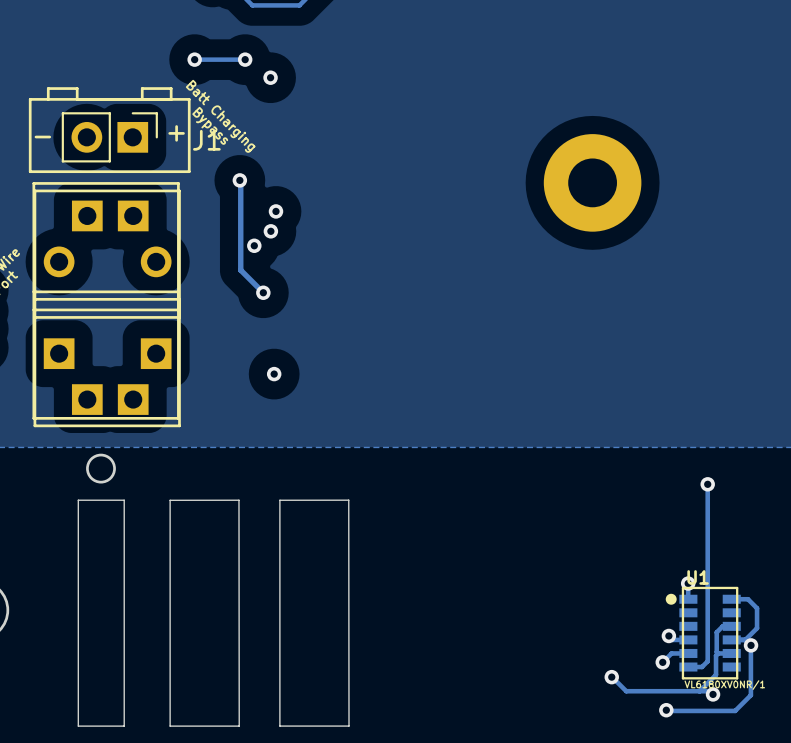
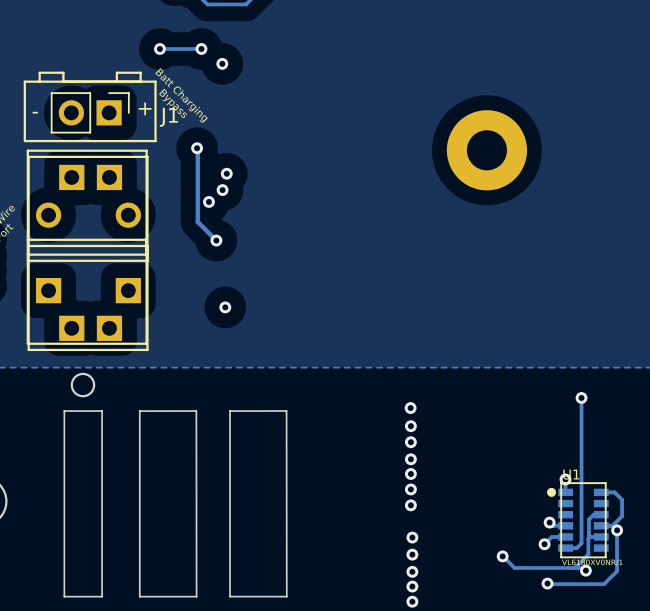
via: none -> (410, 408)
via: none -> (410, 426)
via: none -> (410, 442)
via: none -> (410, 459)
via: none -> (410, 473)
via: none -> (410, 489)
via: none -> (410, 505)
via: none -> (412, 537)
via: none -> (412, 554)
via: none -> (412, 571)
via: none -> (412, 586)
via: none -> (412, 601)

